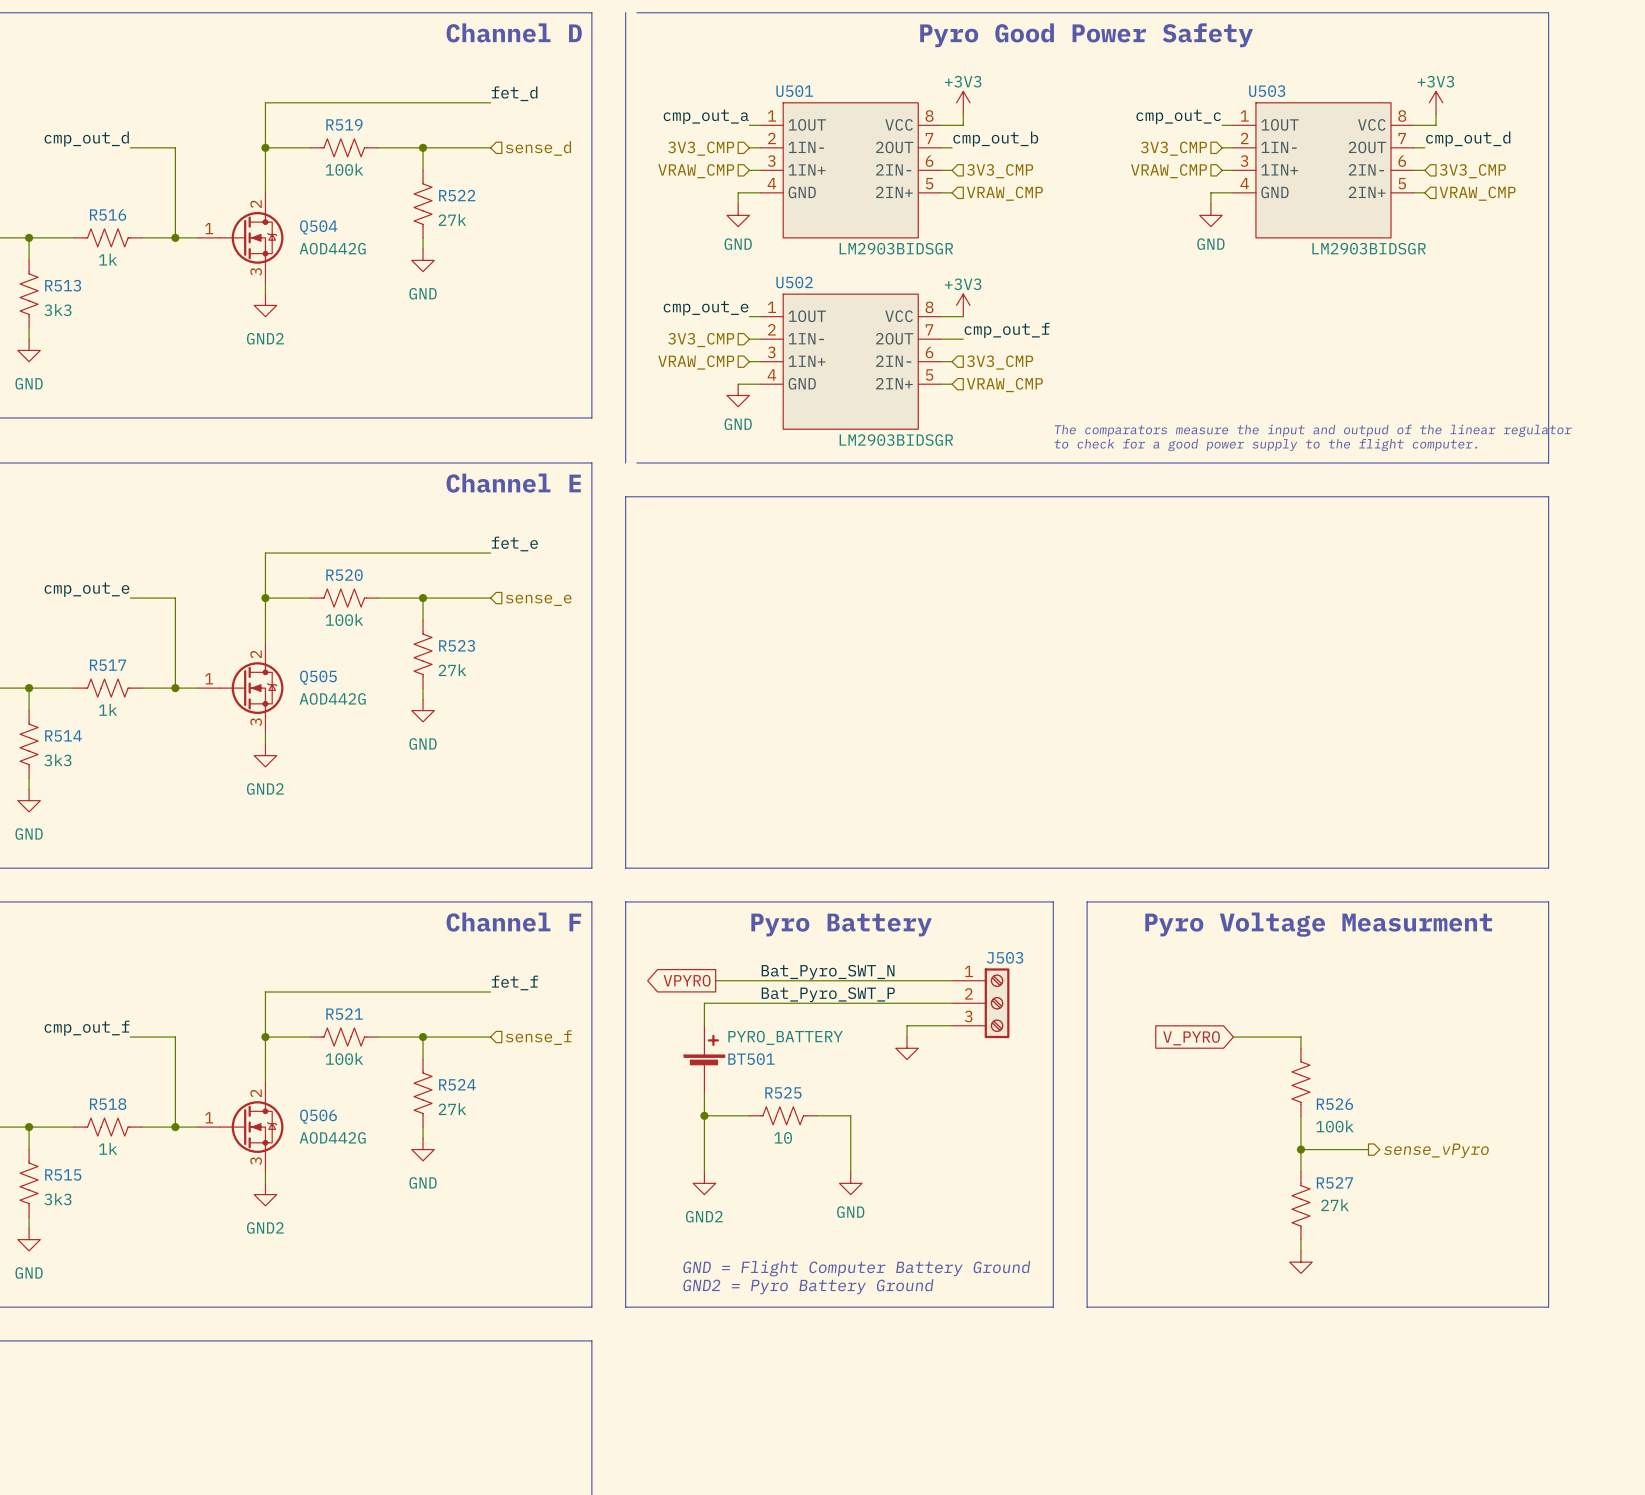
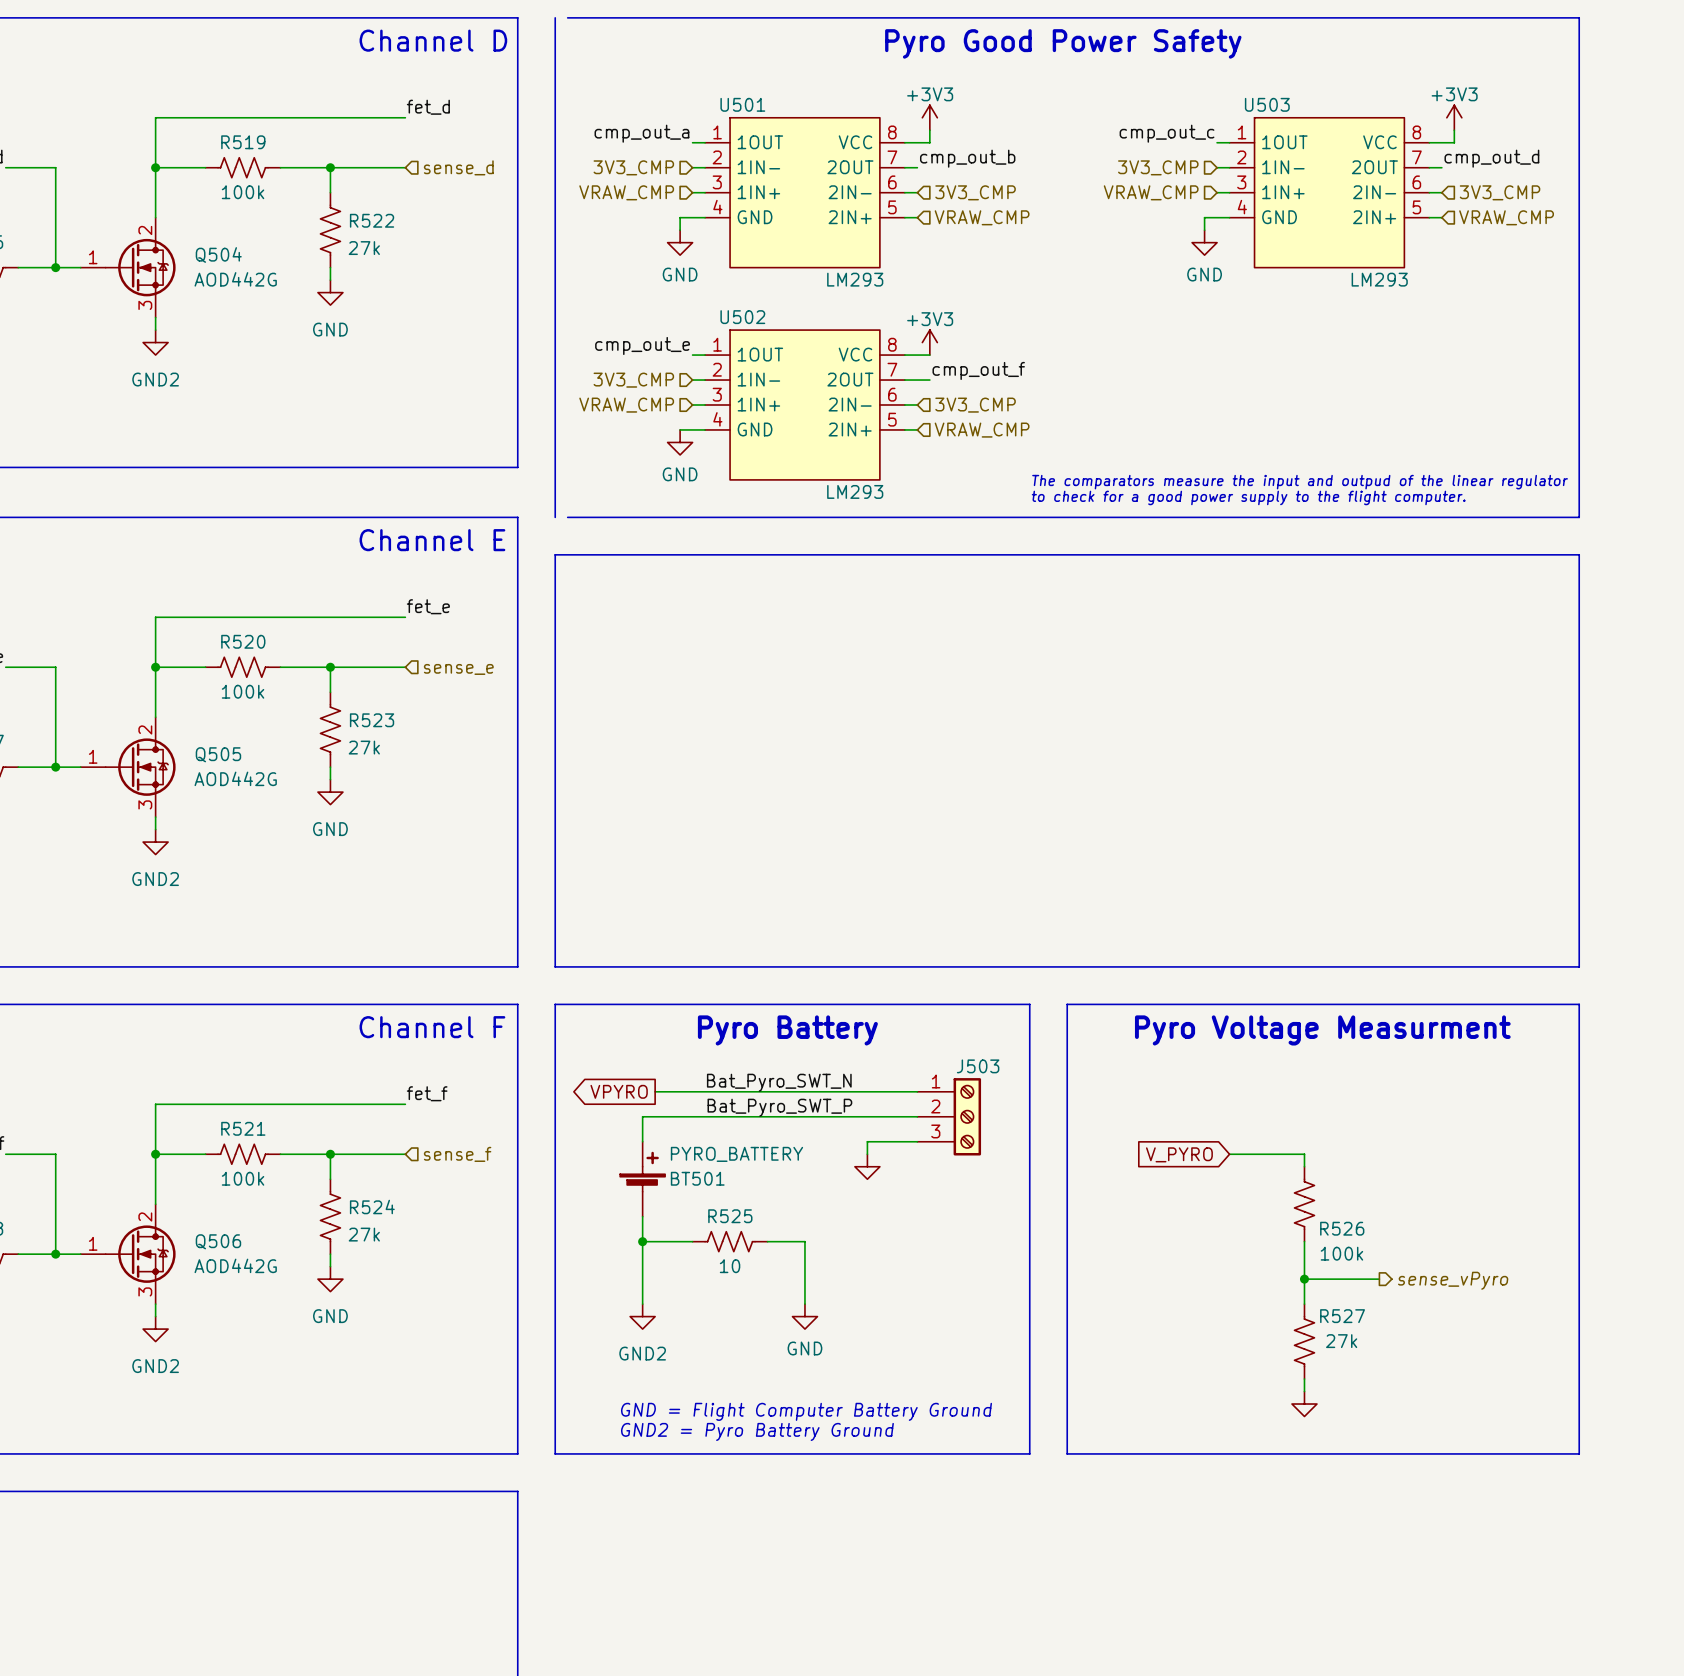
U501 value: LM2903BIDSGR (896, 248) -> LM293 (855, 279)
U503 value: LM2903BIDSGR (1369, 248) -> LM293 (1379, 279)
U502 value: LM2903BIDSGR (896, 440) -> LM293 (855, 491)

